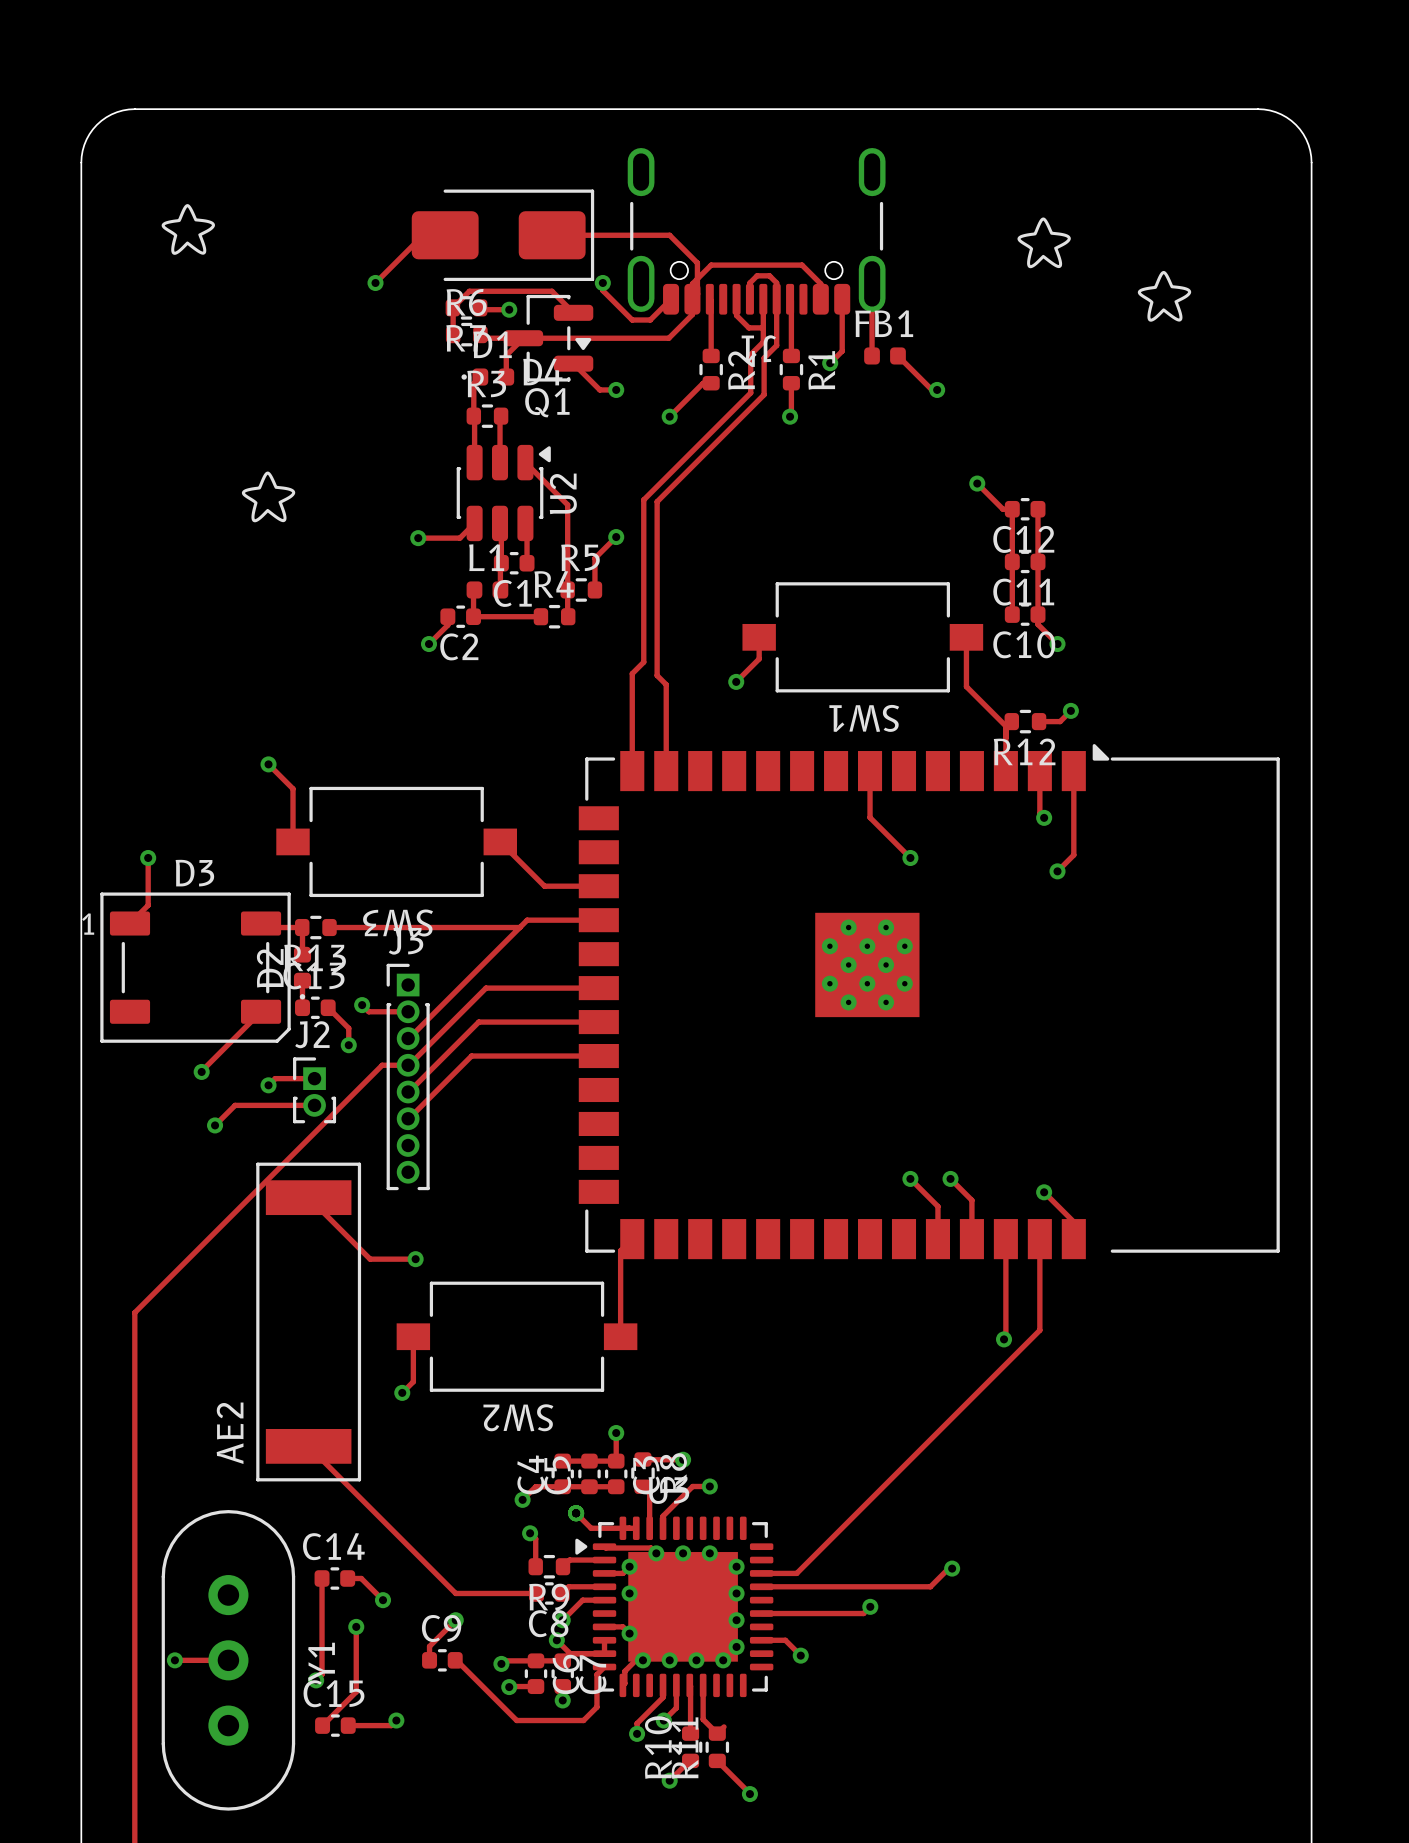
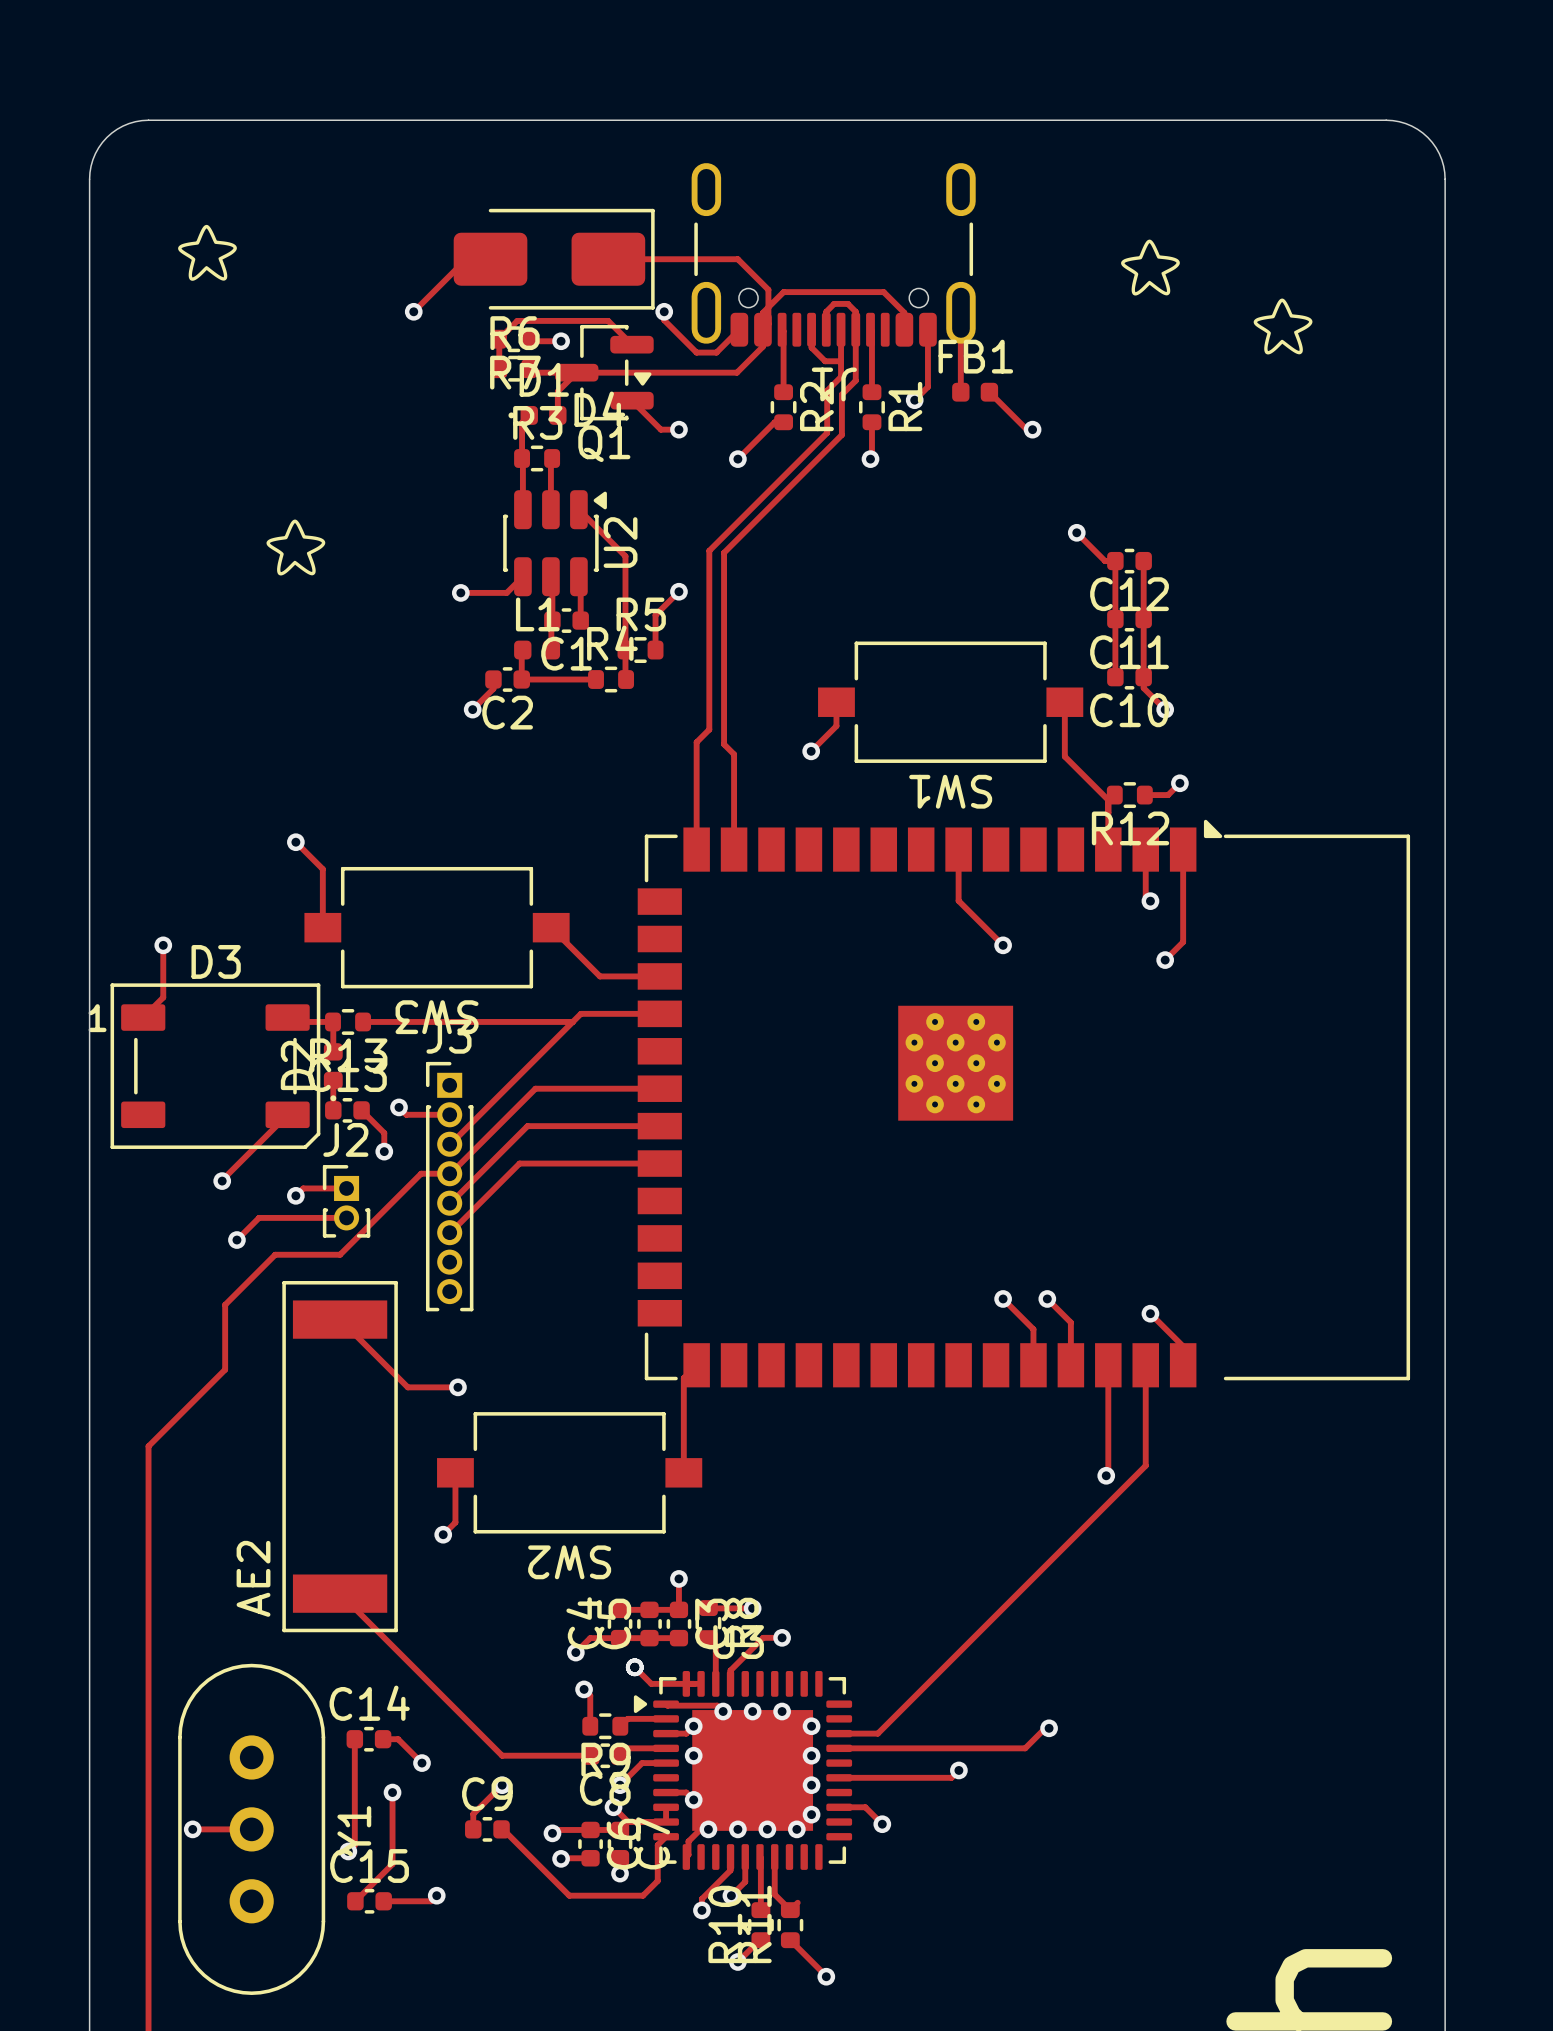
track: (308, 1138) (204, 1243) -> (340, 1254) (275, 1254) (225, 1304) (225, 1369)

